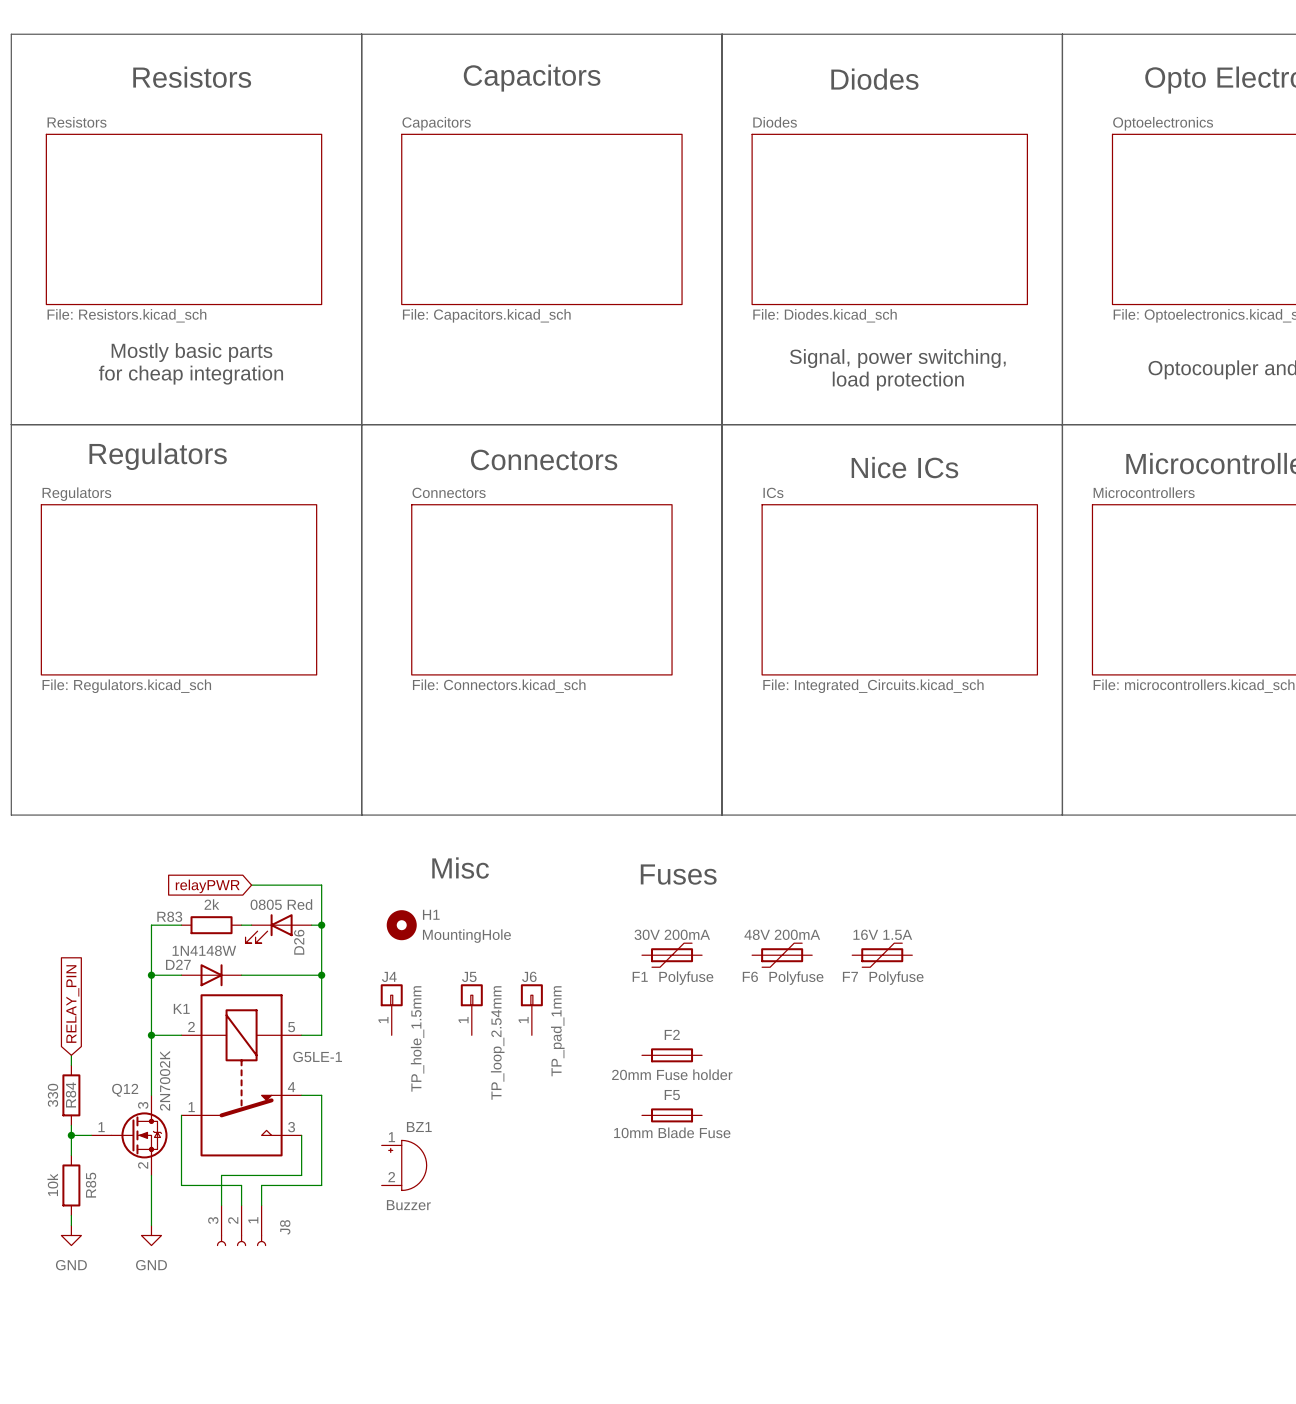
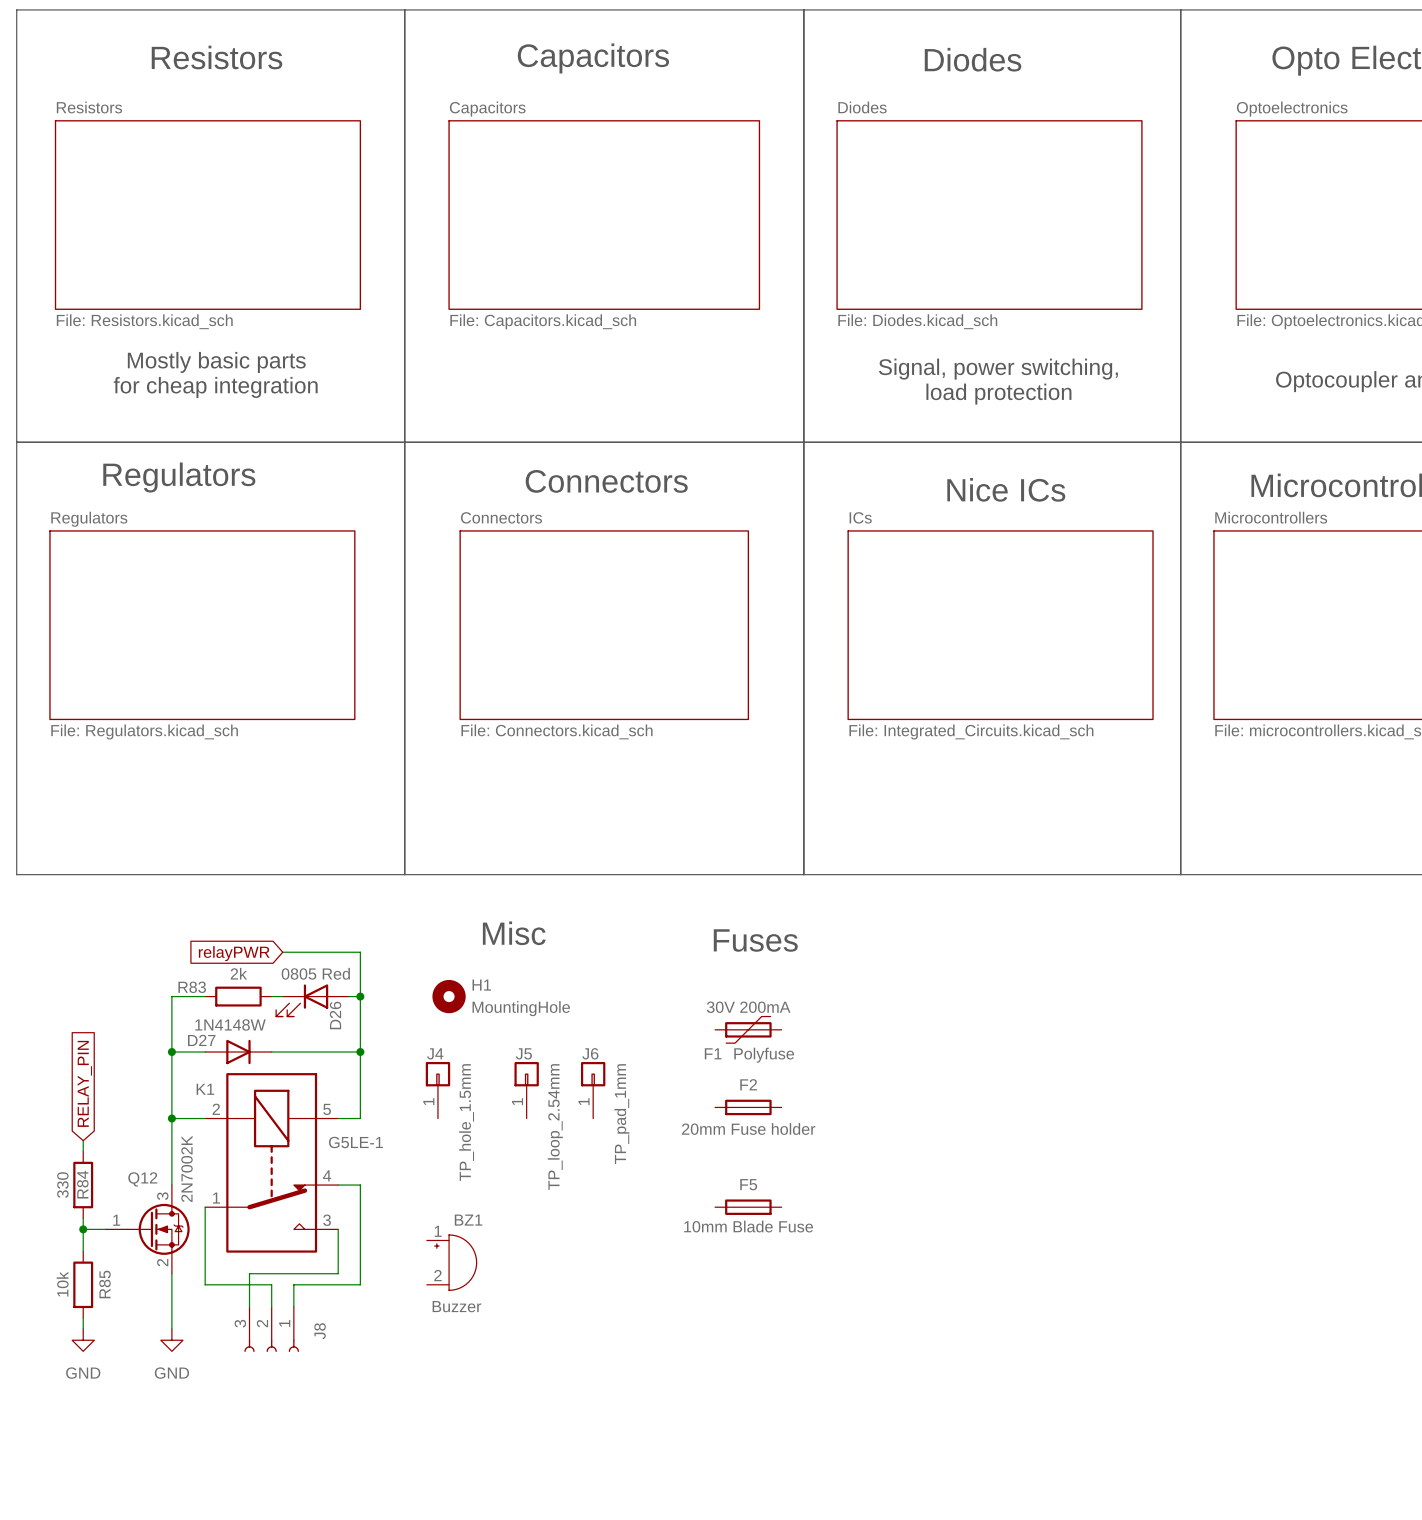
F6: Polyfuse (782, 955) -> none
F7: Polyfuse (882, 955) -> none
F2 position: (672, 1055) -> (748, 1107)

